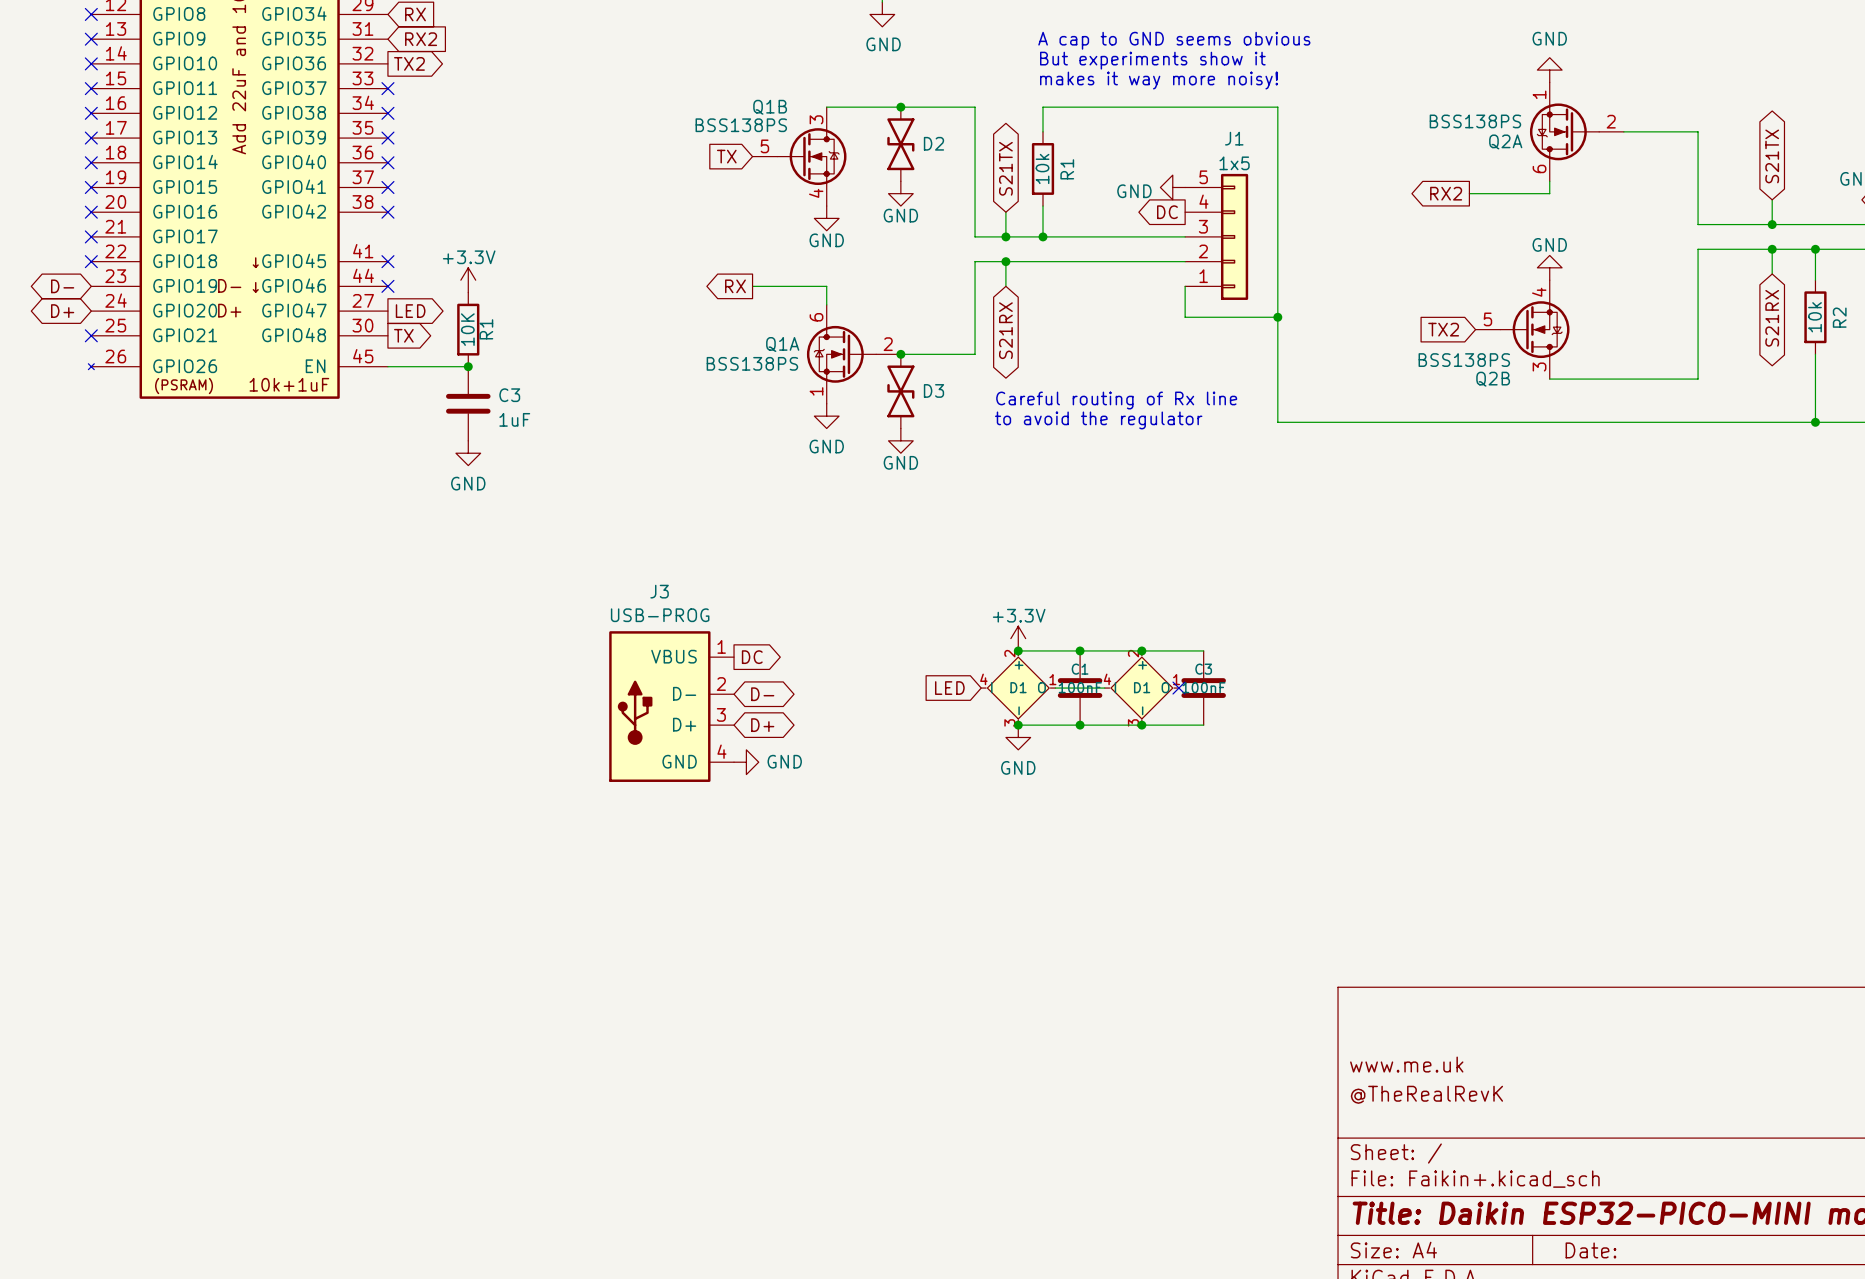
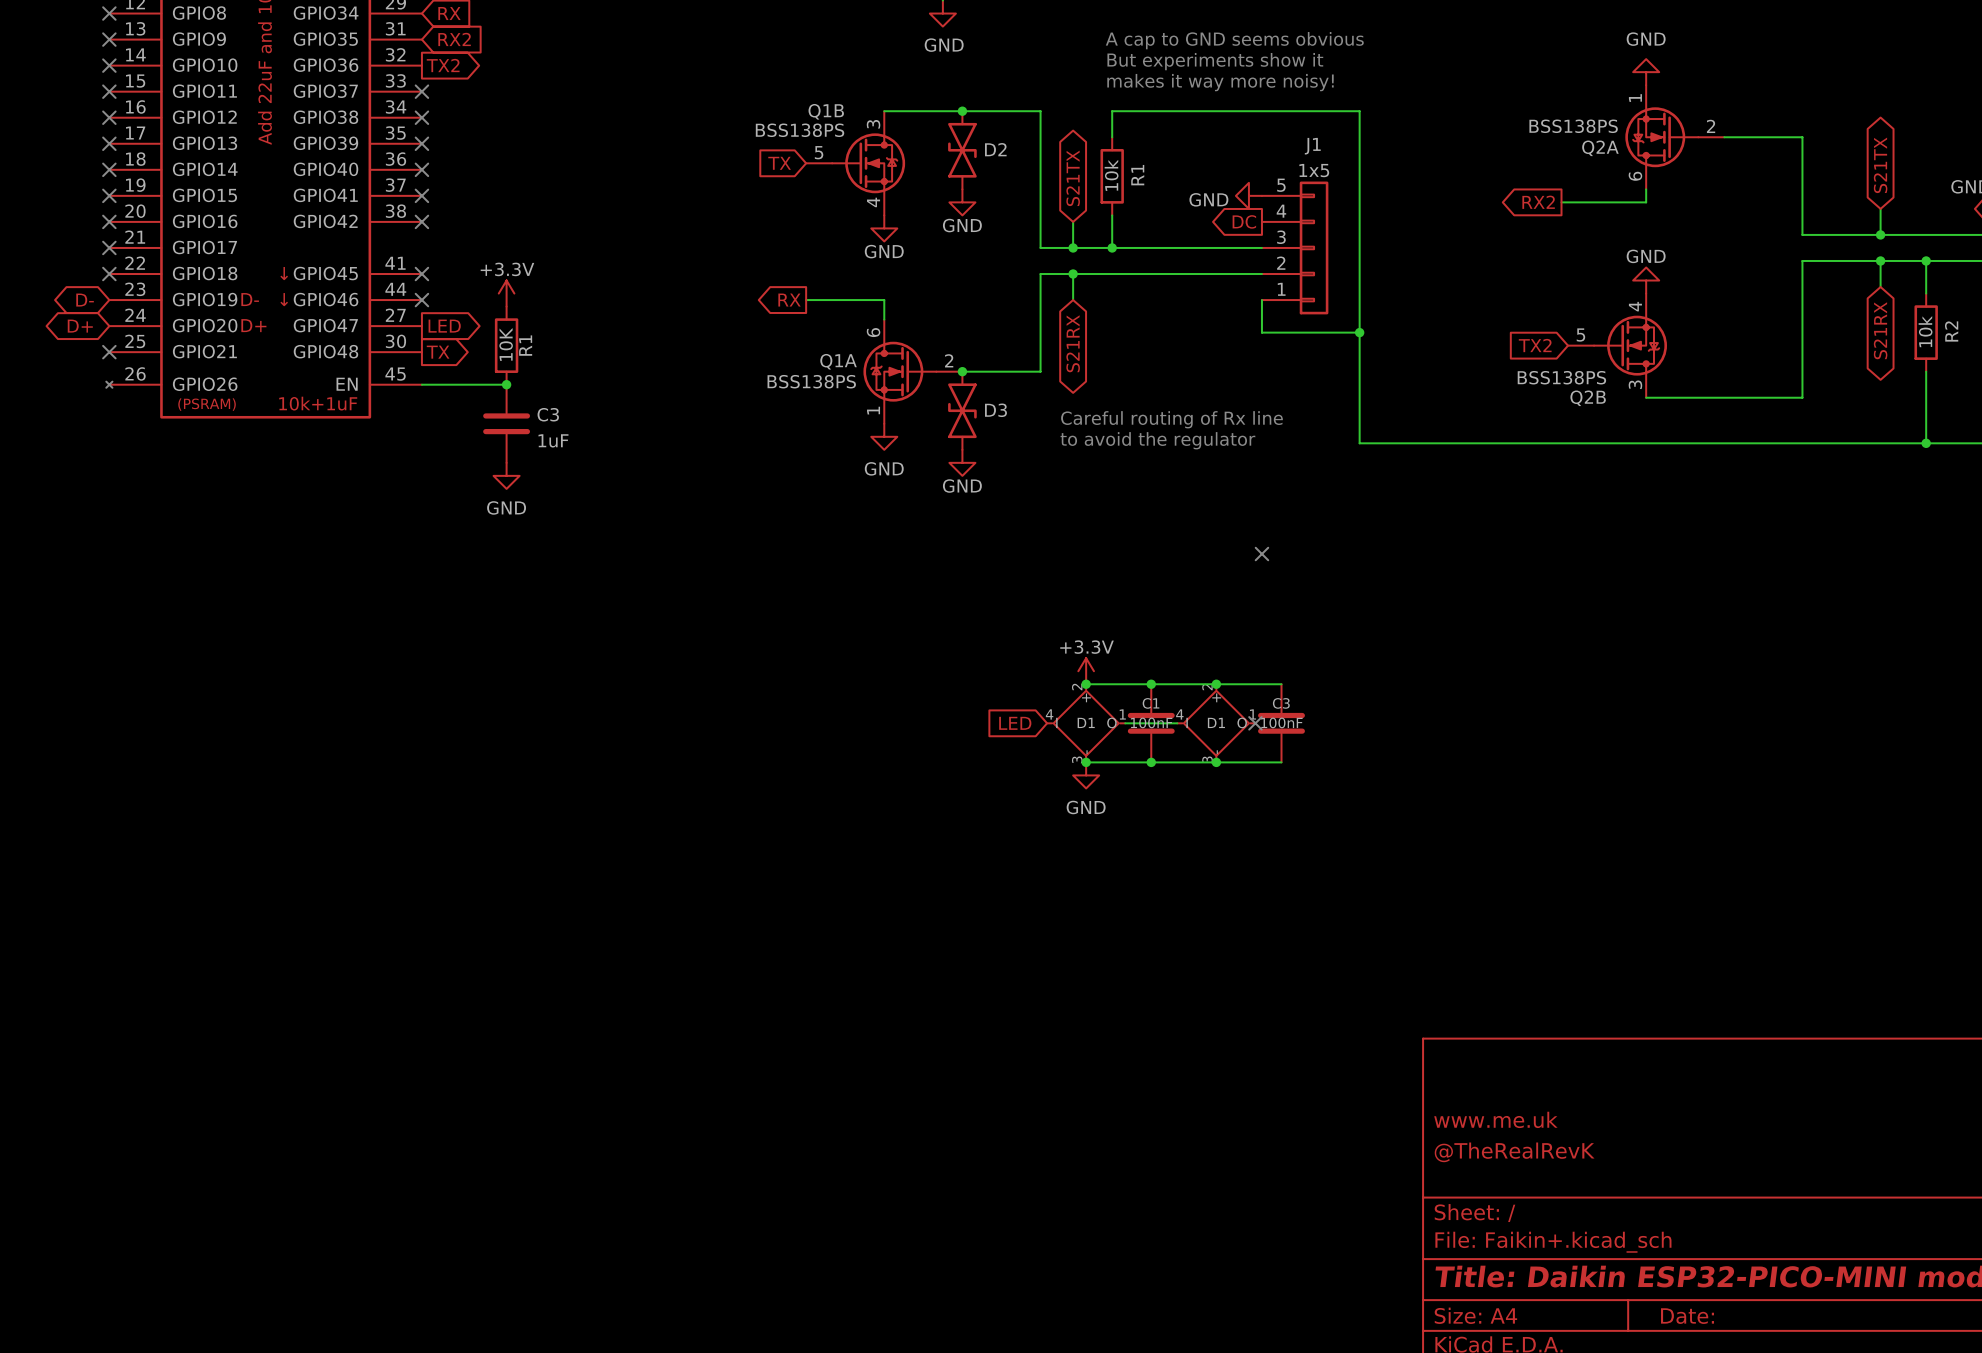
no-connect mark: none -> (1261, 554)
global label: DC (752, 657) -> none
global label: D- (762, 694) -> none
J3: USB-PROG (671, 706) -> none
global label: D+ (762, 725) -> none
power symbol: GND (746, 762) -> none

